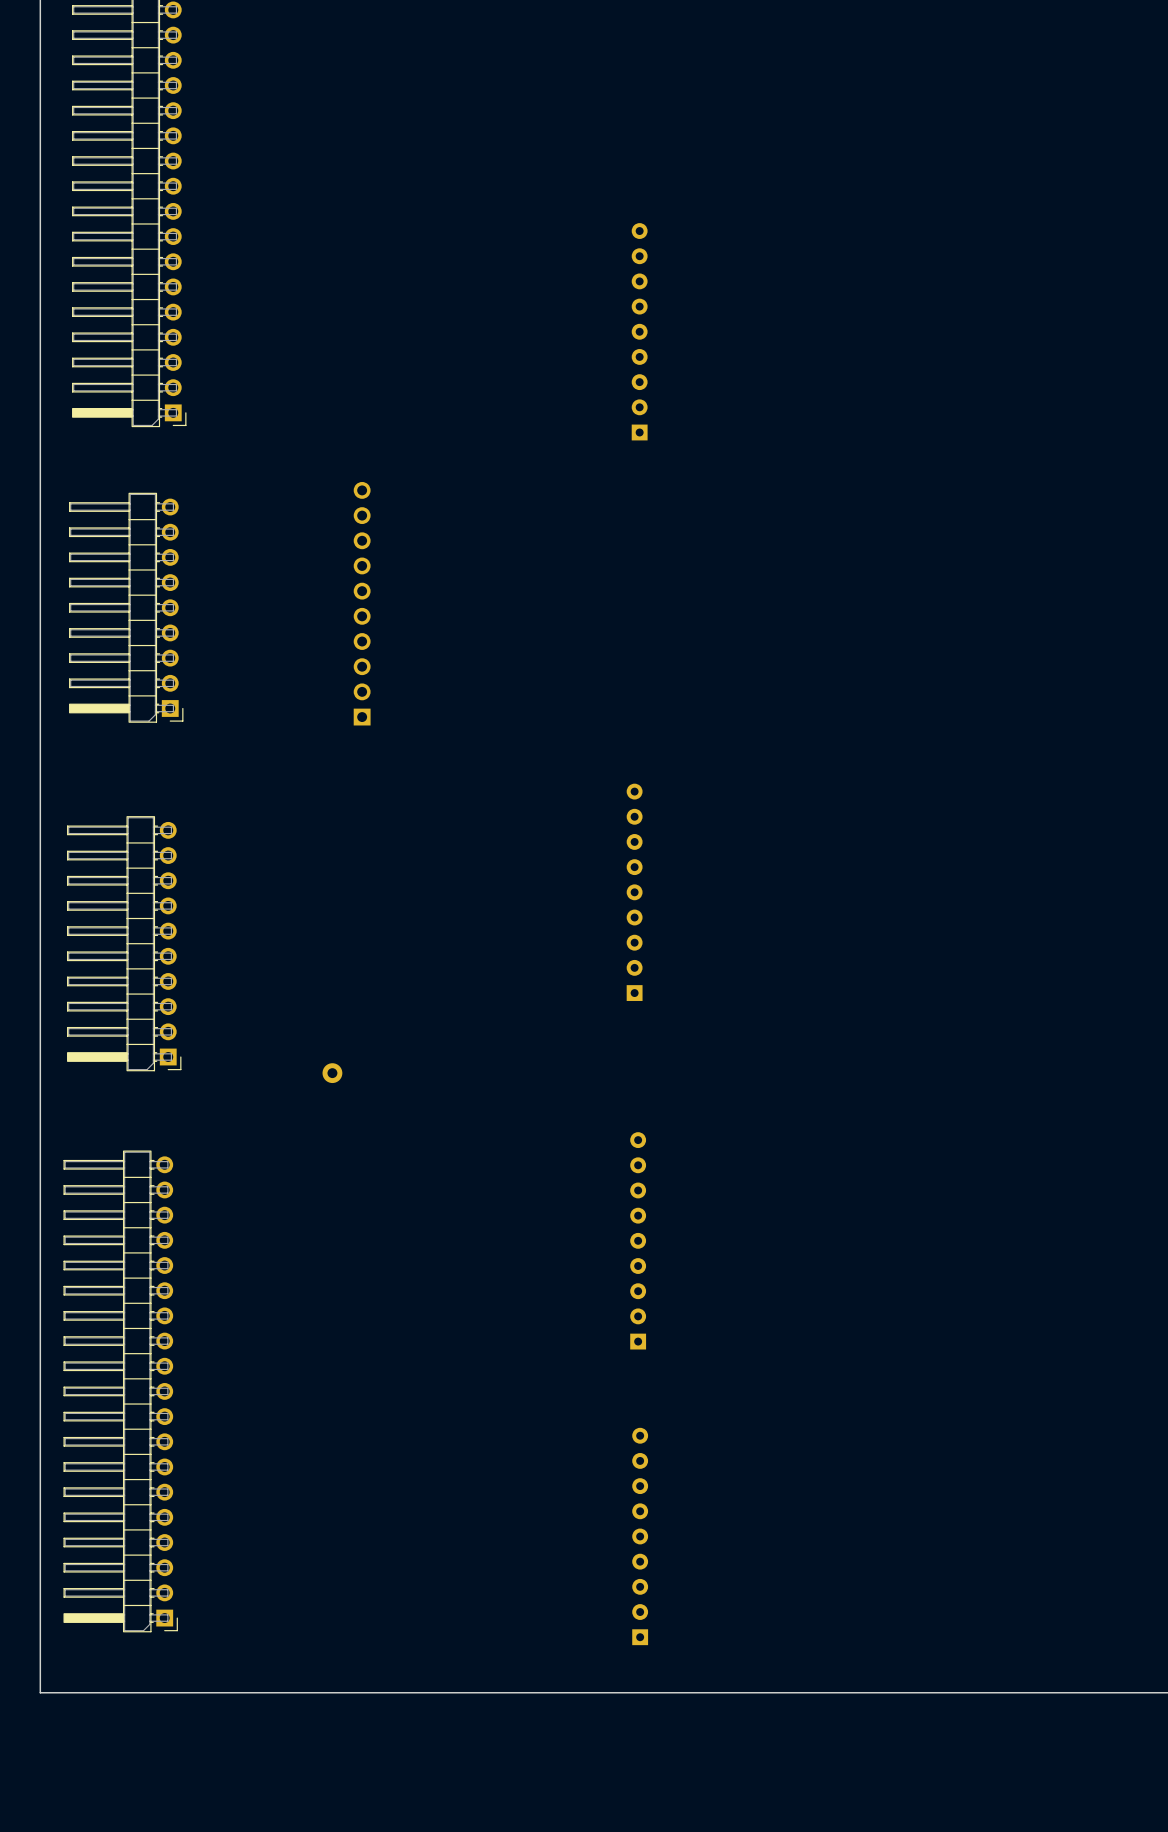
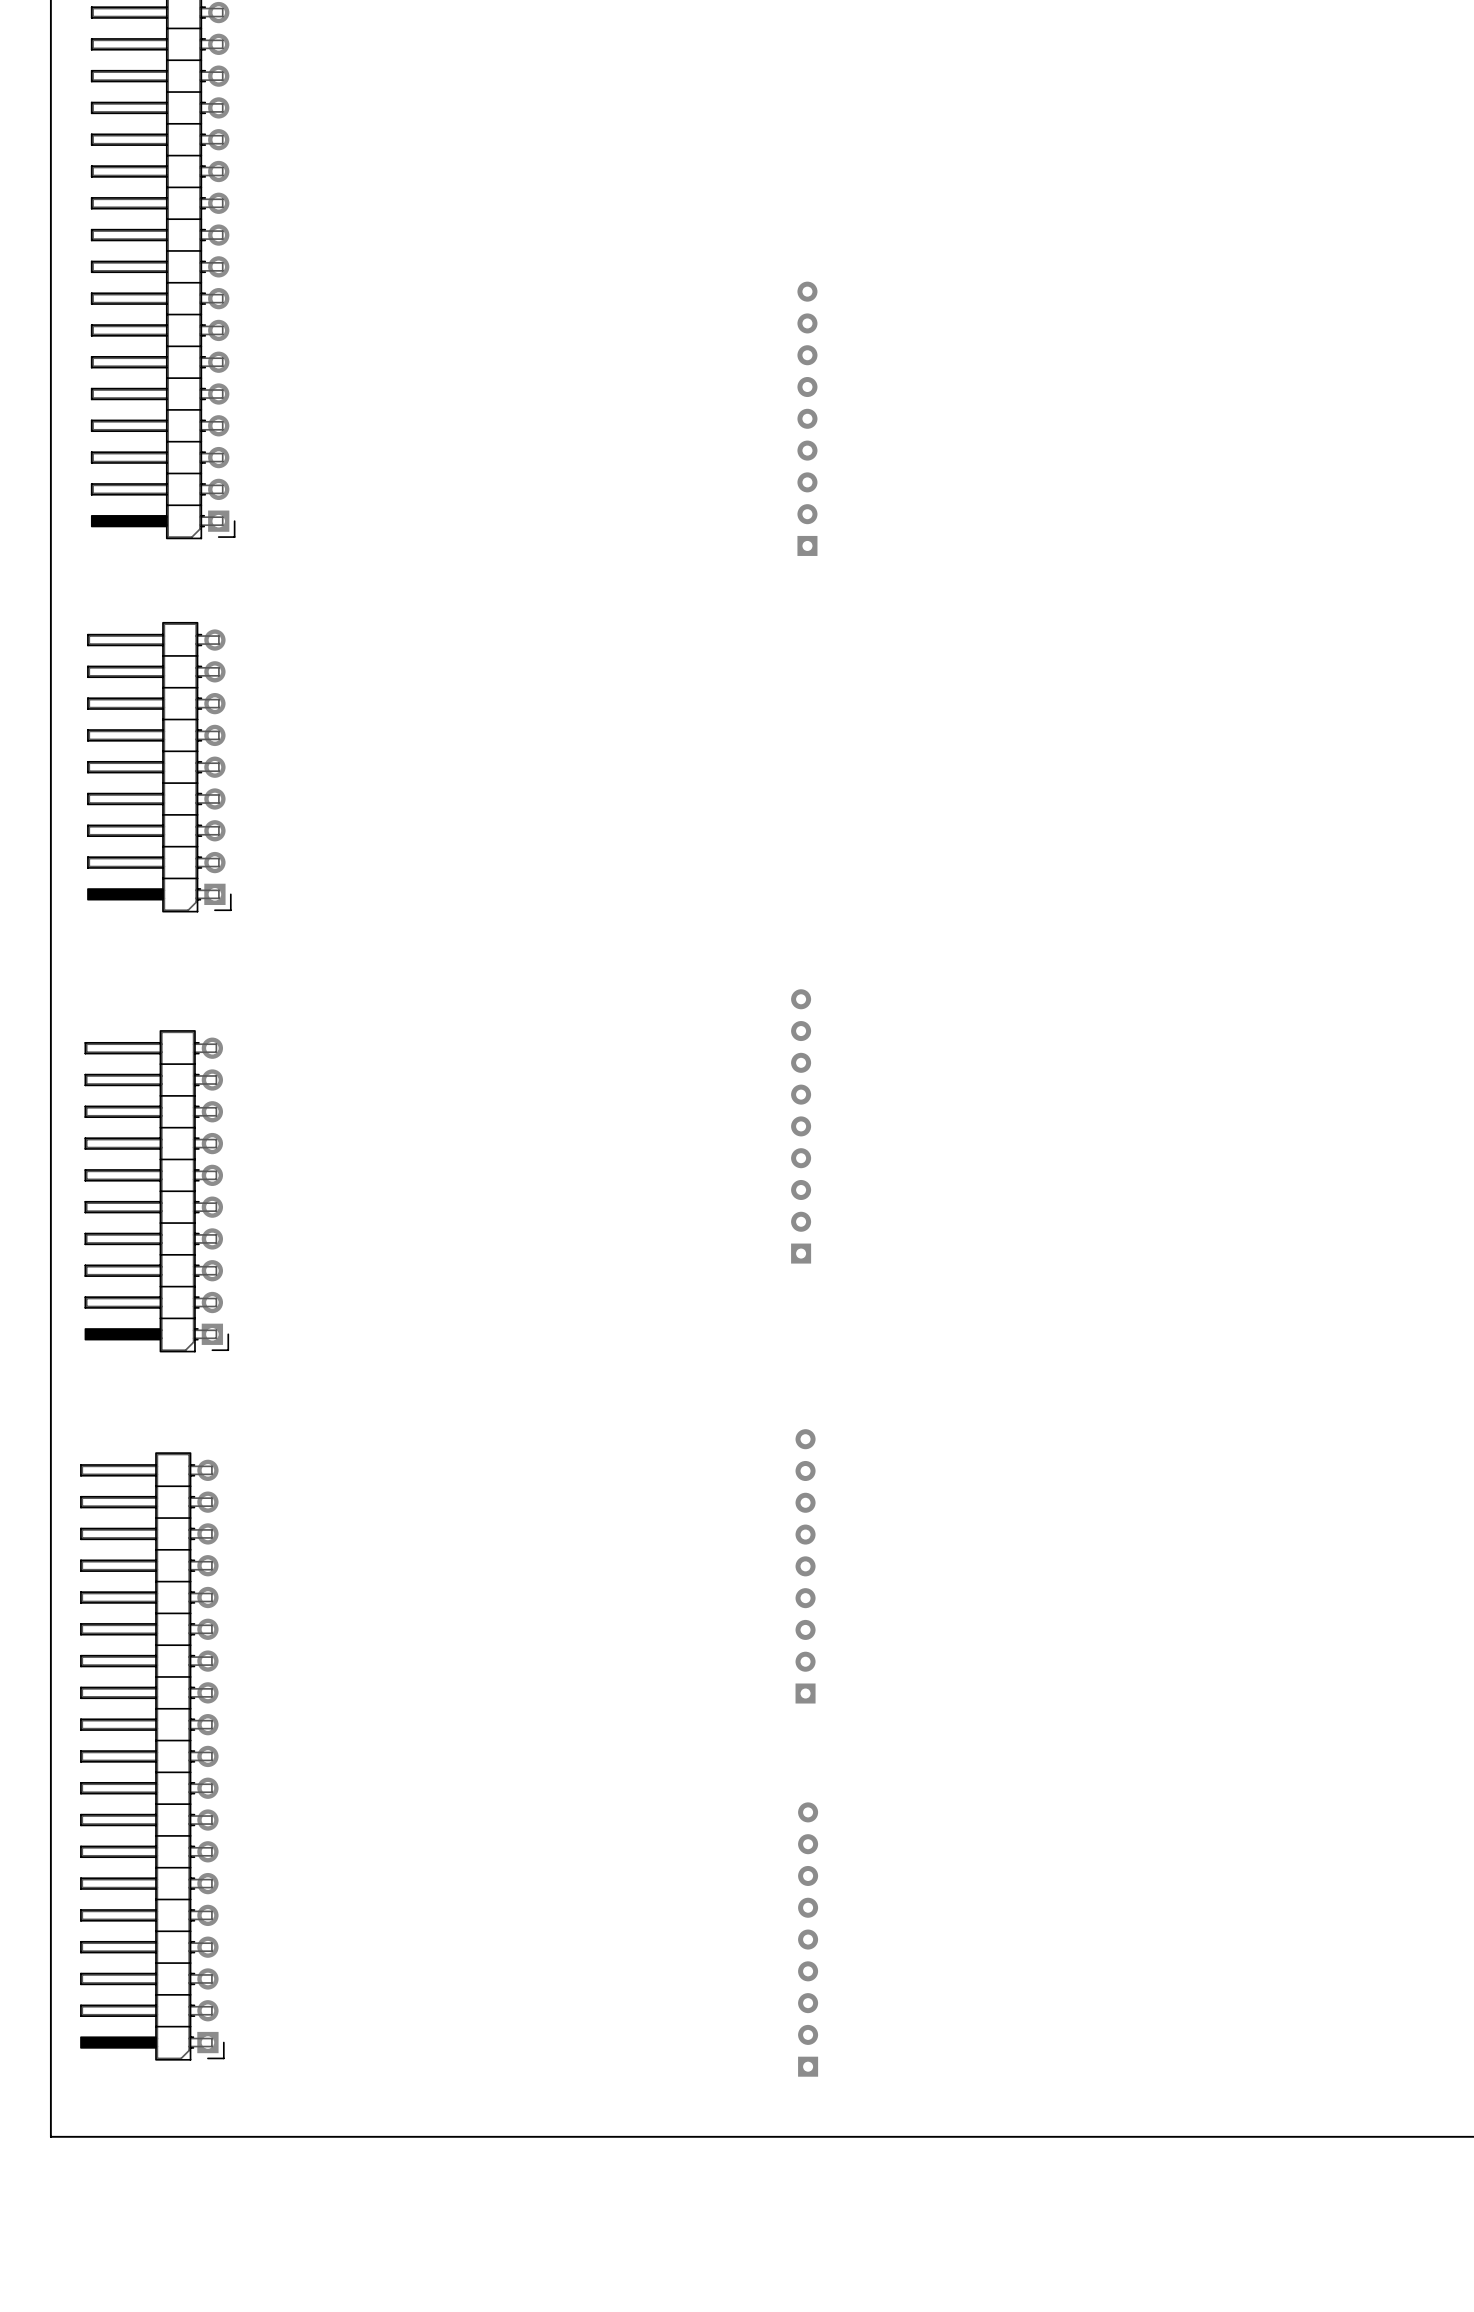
part: (362, 603) -> none
part: (332, 1073) -> none

